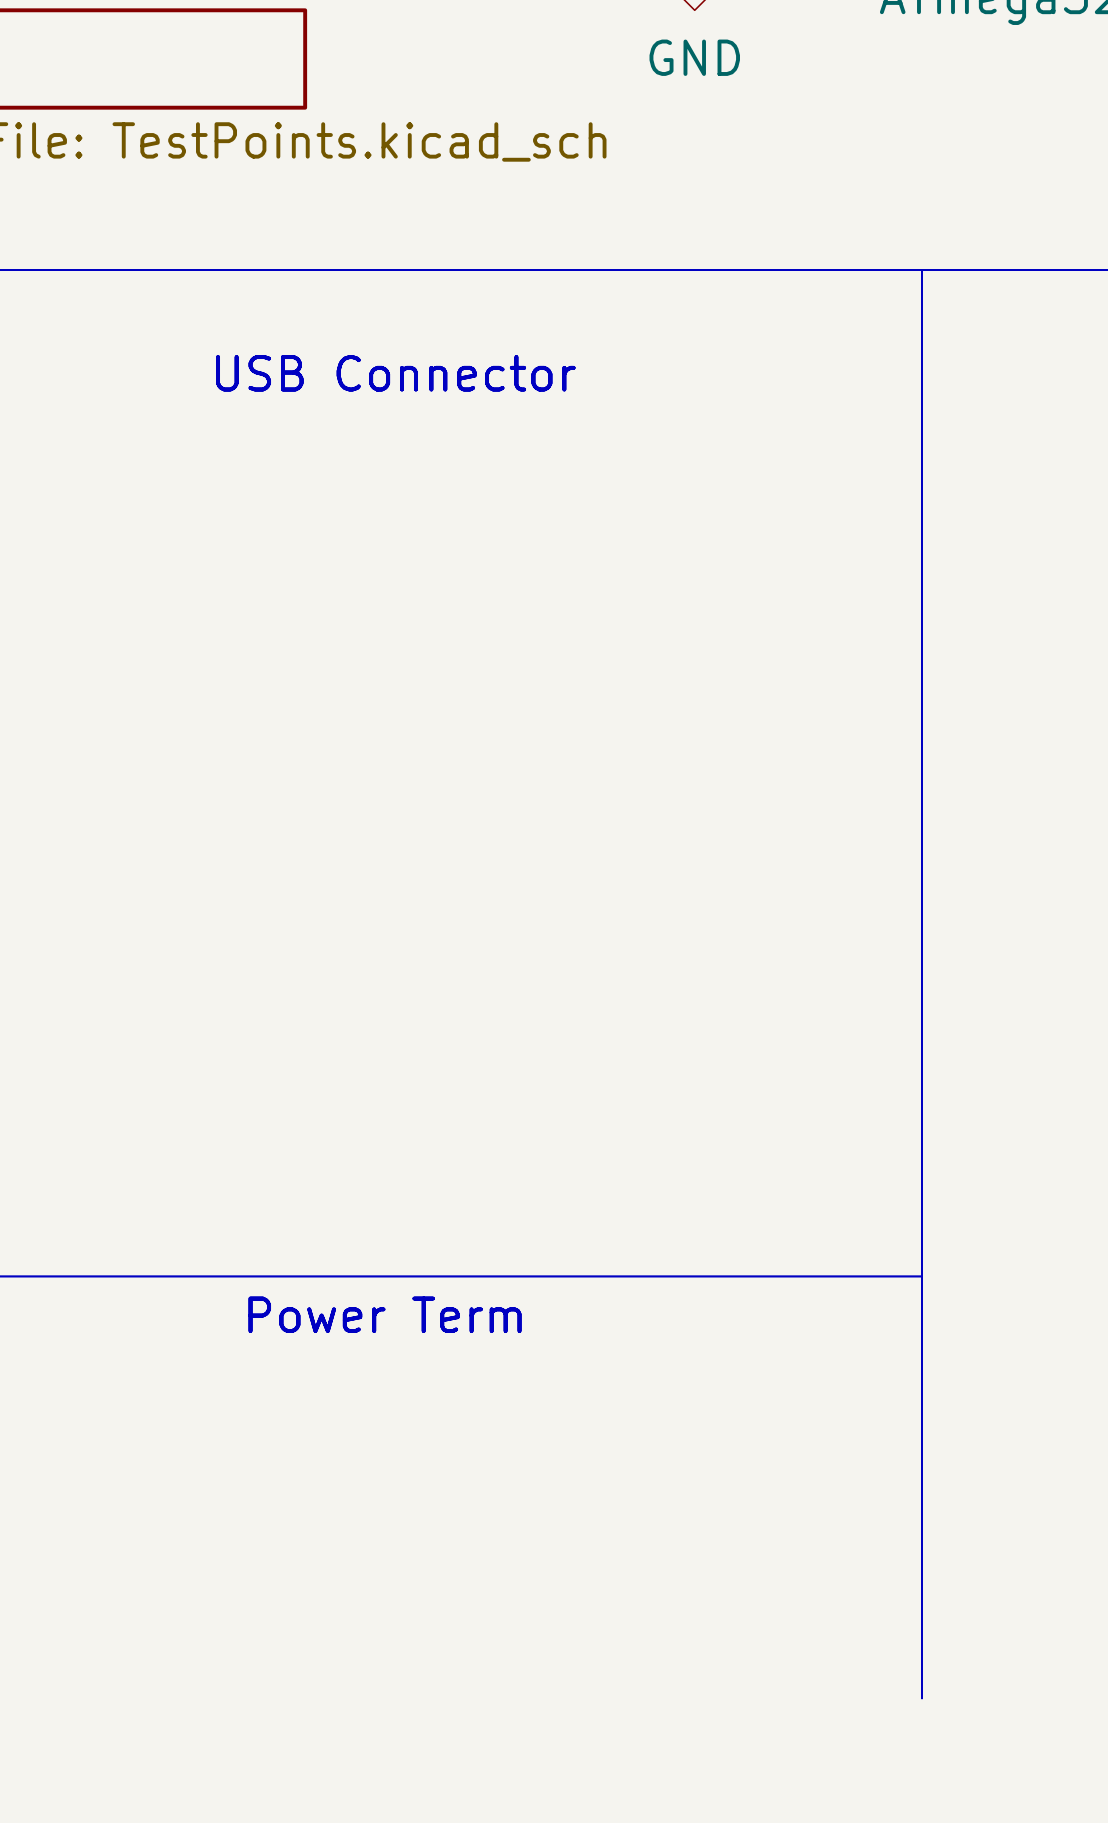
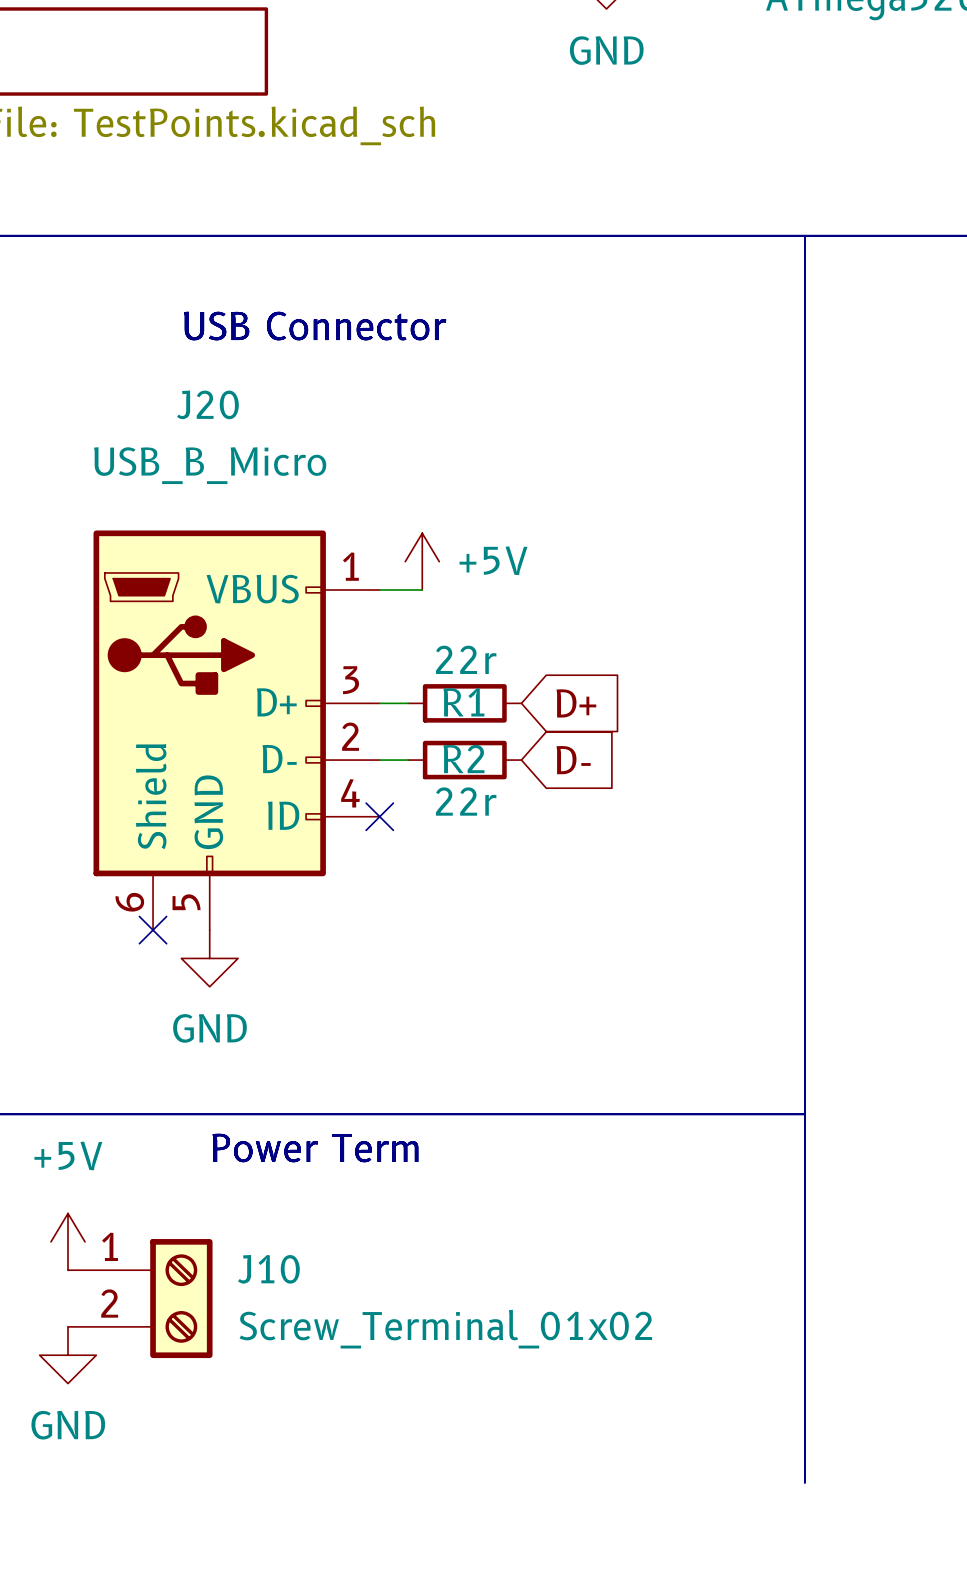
power symbol: none -> +5V (422, 561)
wire: none -> (379, 590) (422, 590)
wire: none -> (379, 703) (408, 703)
R1: none -> 22r (464, 703)
global label: none -> D+ (576, 703)
J20: none -> USB_B_Micro (236, 730)
wire: none -> (379, 760) (408, 760)
R2: none -> 22r (464, 760)
global label: none -> D- (573, 760)
no-connect mark: none -> (379, 816)
no-connect mark: none -> (153, 930)
power symbol: none -> GND (209, 958)
power symbol: none -> +5V (68, 1241)
J10: none -> Screw_Terminal_01x02 (140, 1298)
power symbol: none -> GND (68, 1355)

